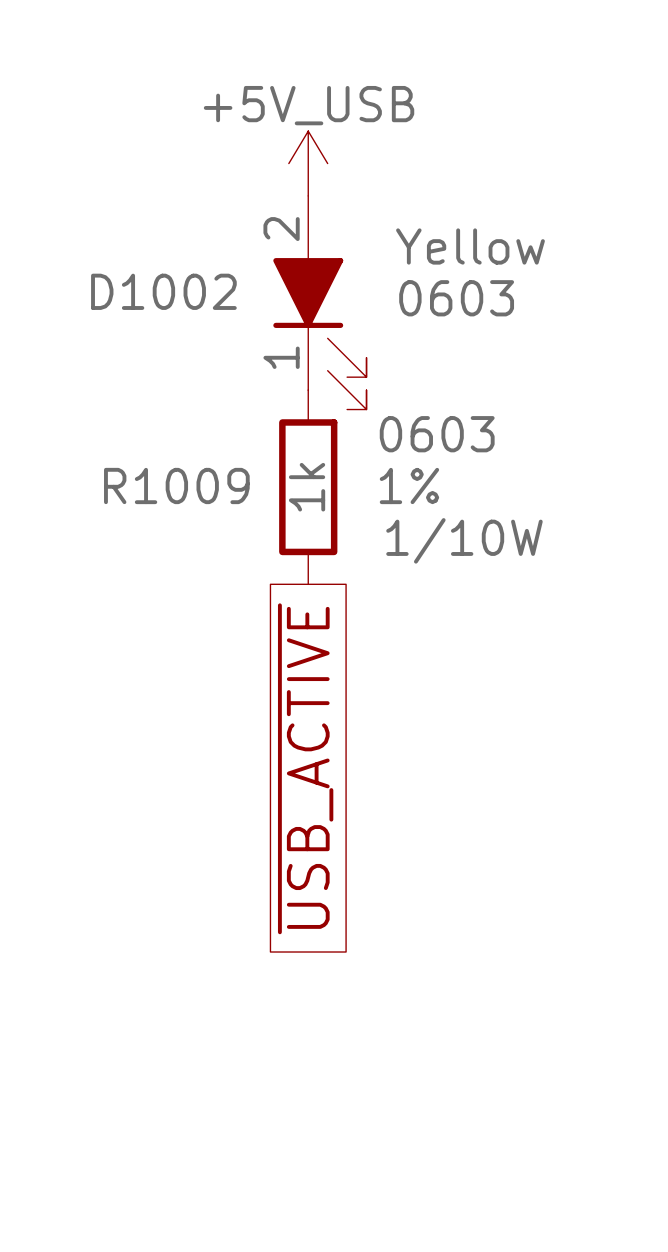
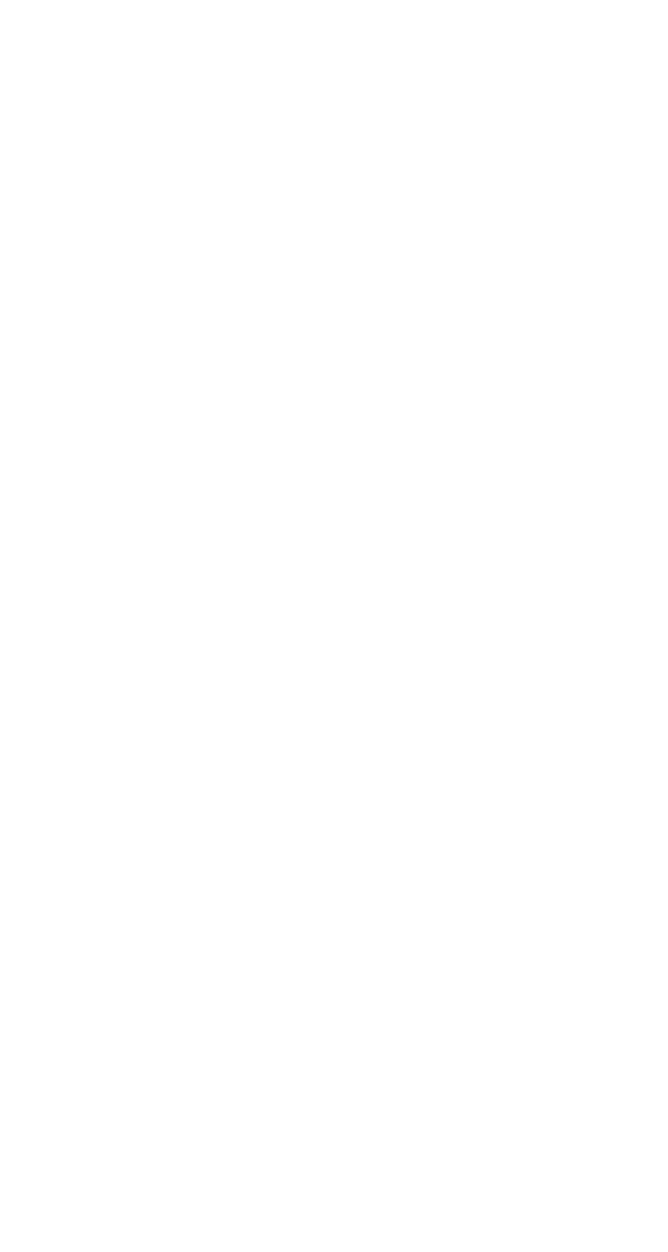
power symbol: +5V_USB (308, 163) -> none
D1002: Yellow (319, 302) -> none
R1009: 1k (308, 487) -> none
global label: ~{USB_ACTIVE} (305, 768) -> none

